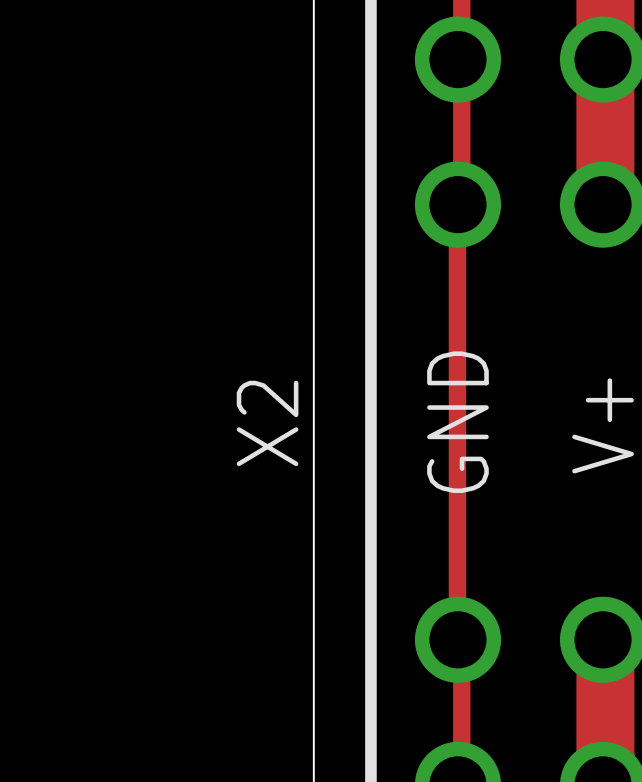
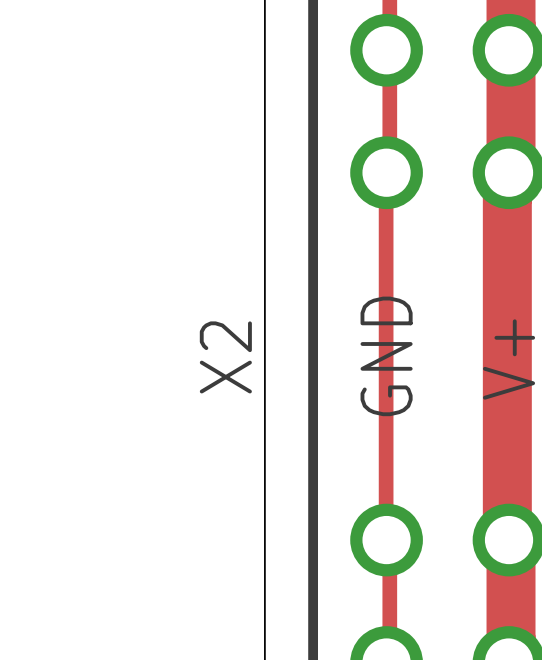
track: none -> (509, 172) (507, 197) (507, 517) (509, 540)

